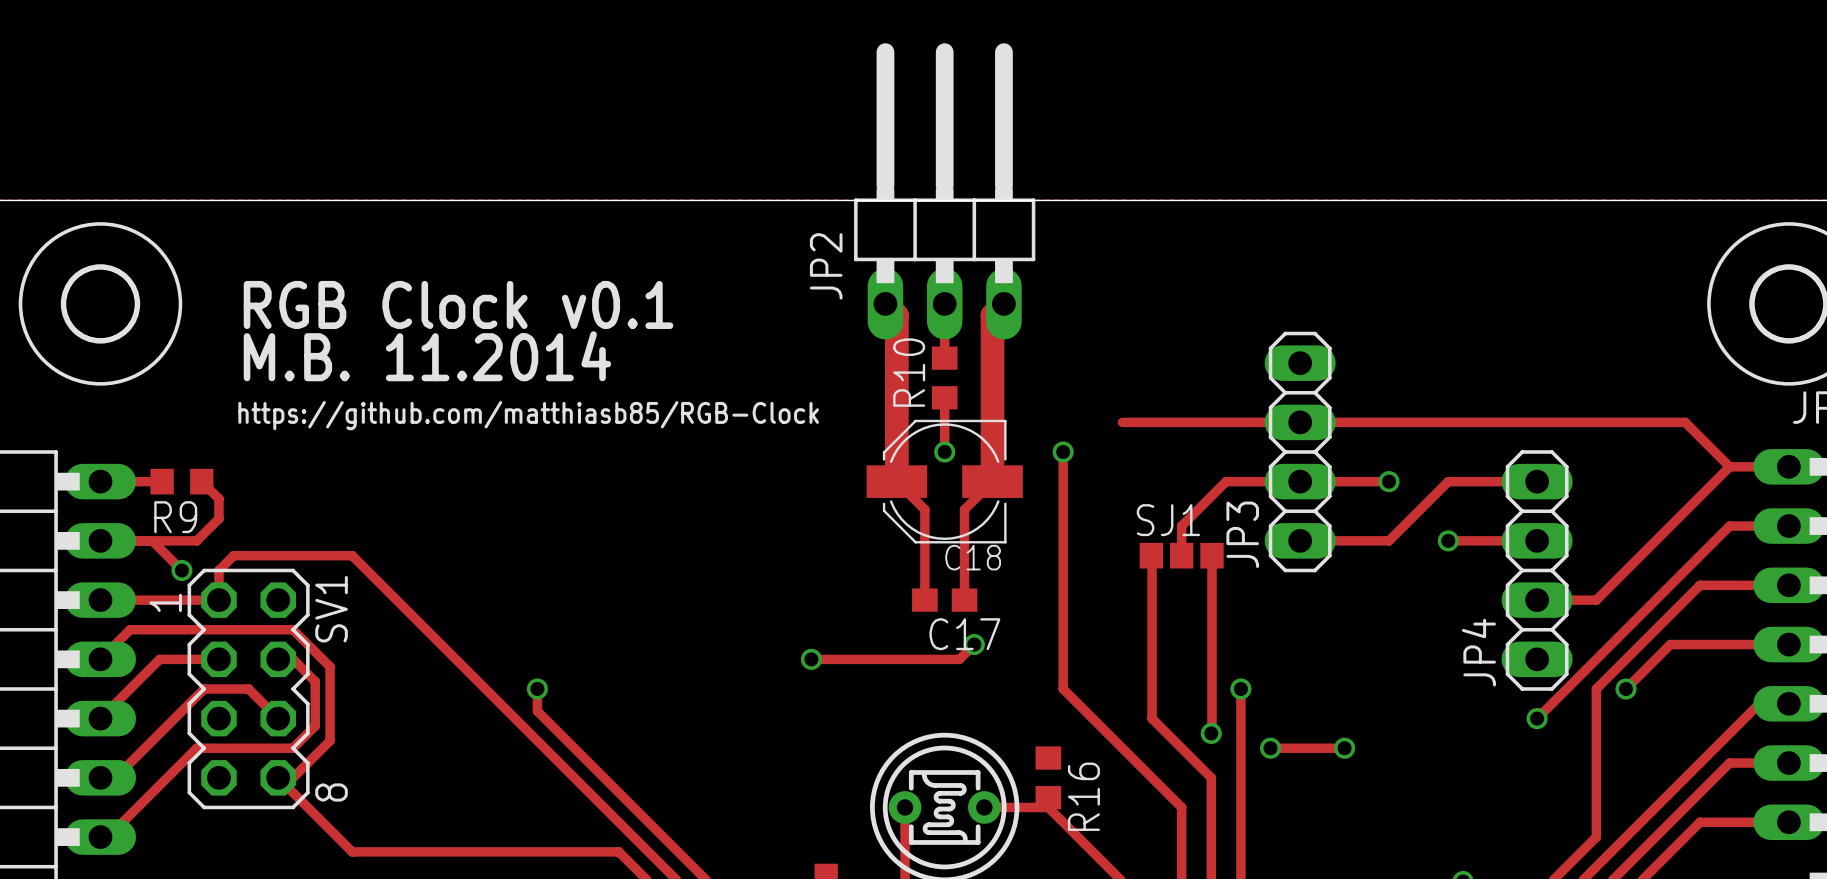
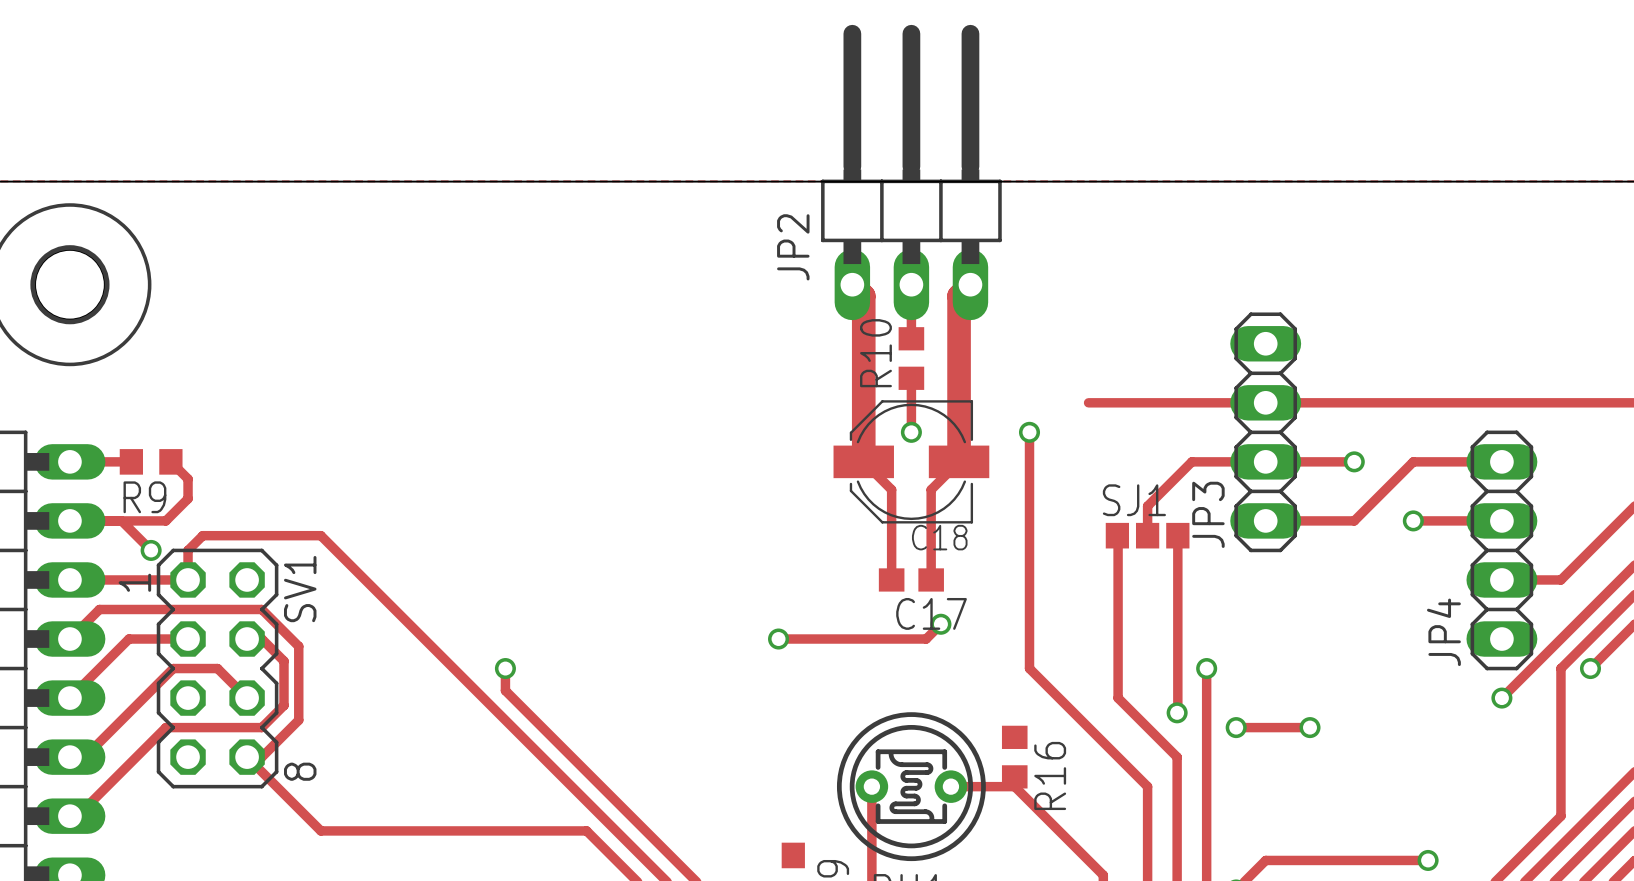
text: RGB Clock v0.1 (458, 304) -> none
text: M.B. 11.2014 (427, 356) -> none
text: https://github.com/matthiasb85/RGB-Clock (528, 415) -> none

